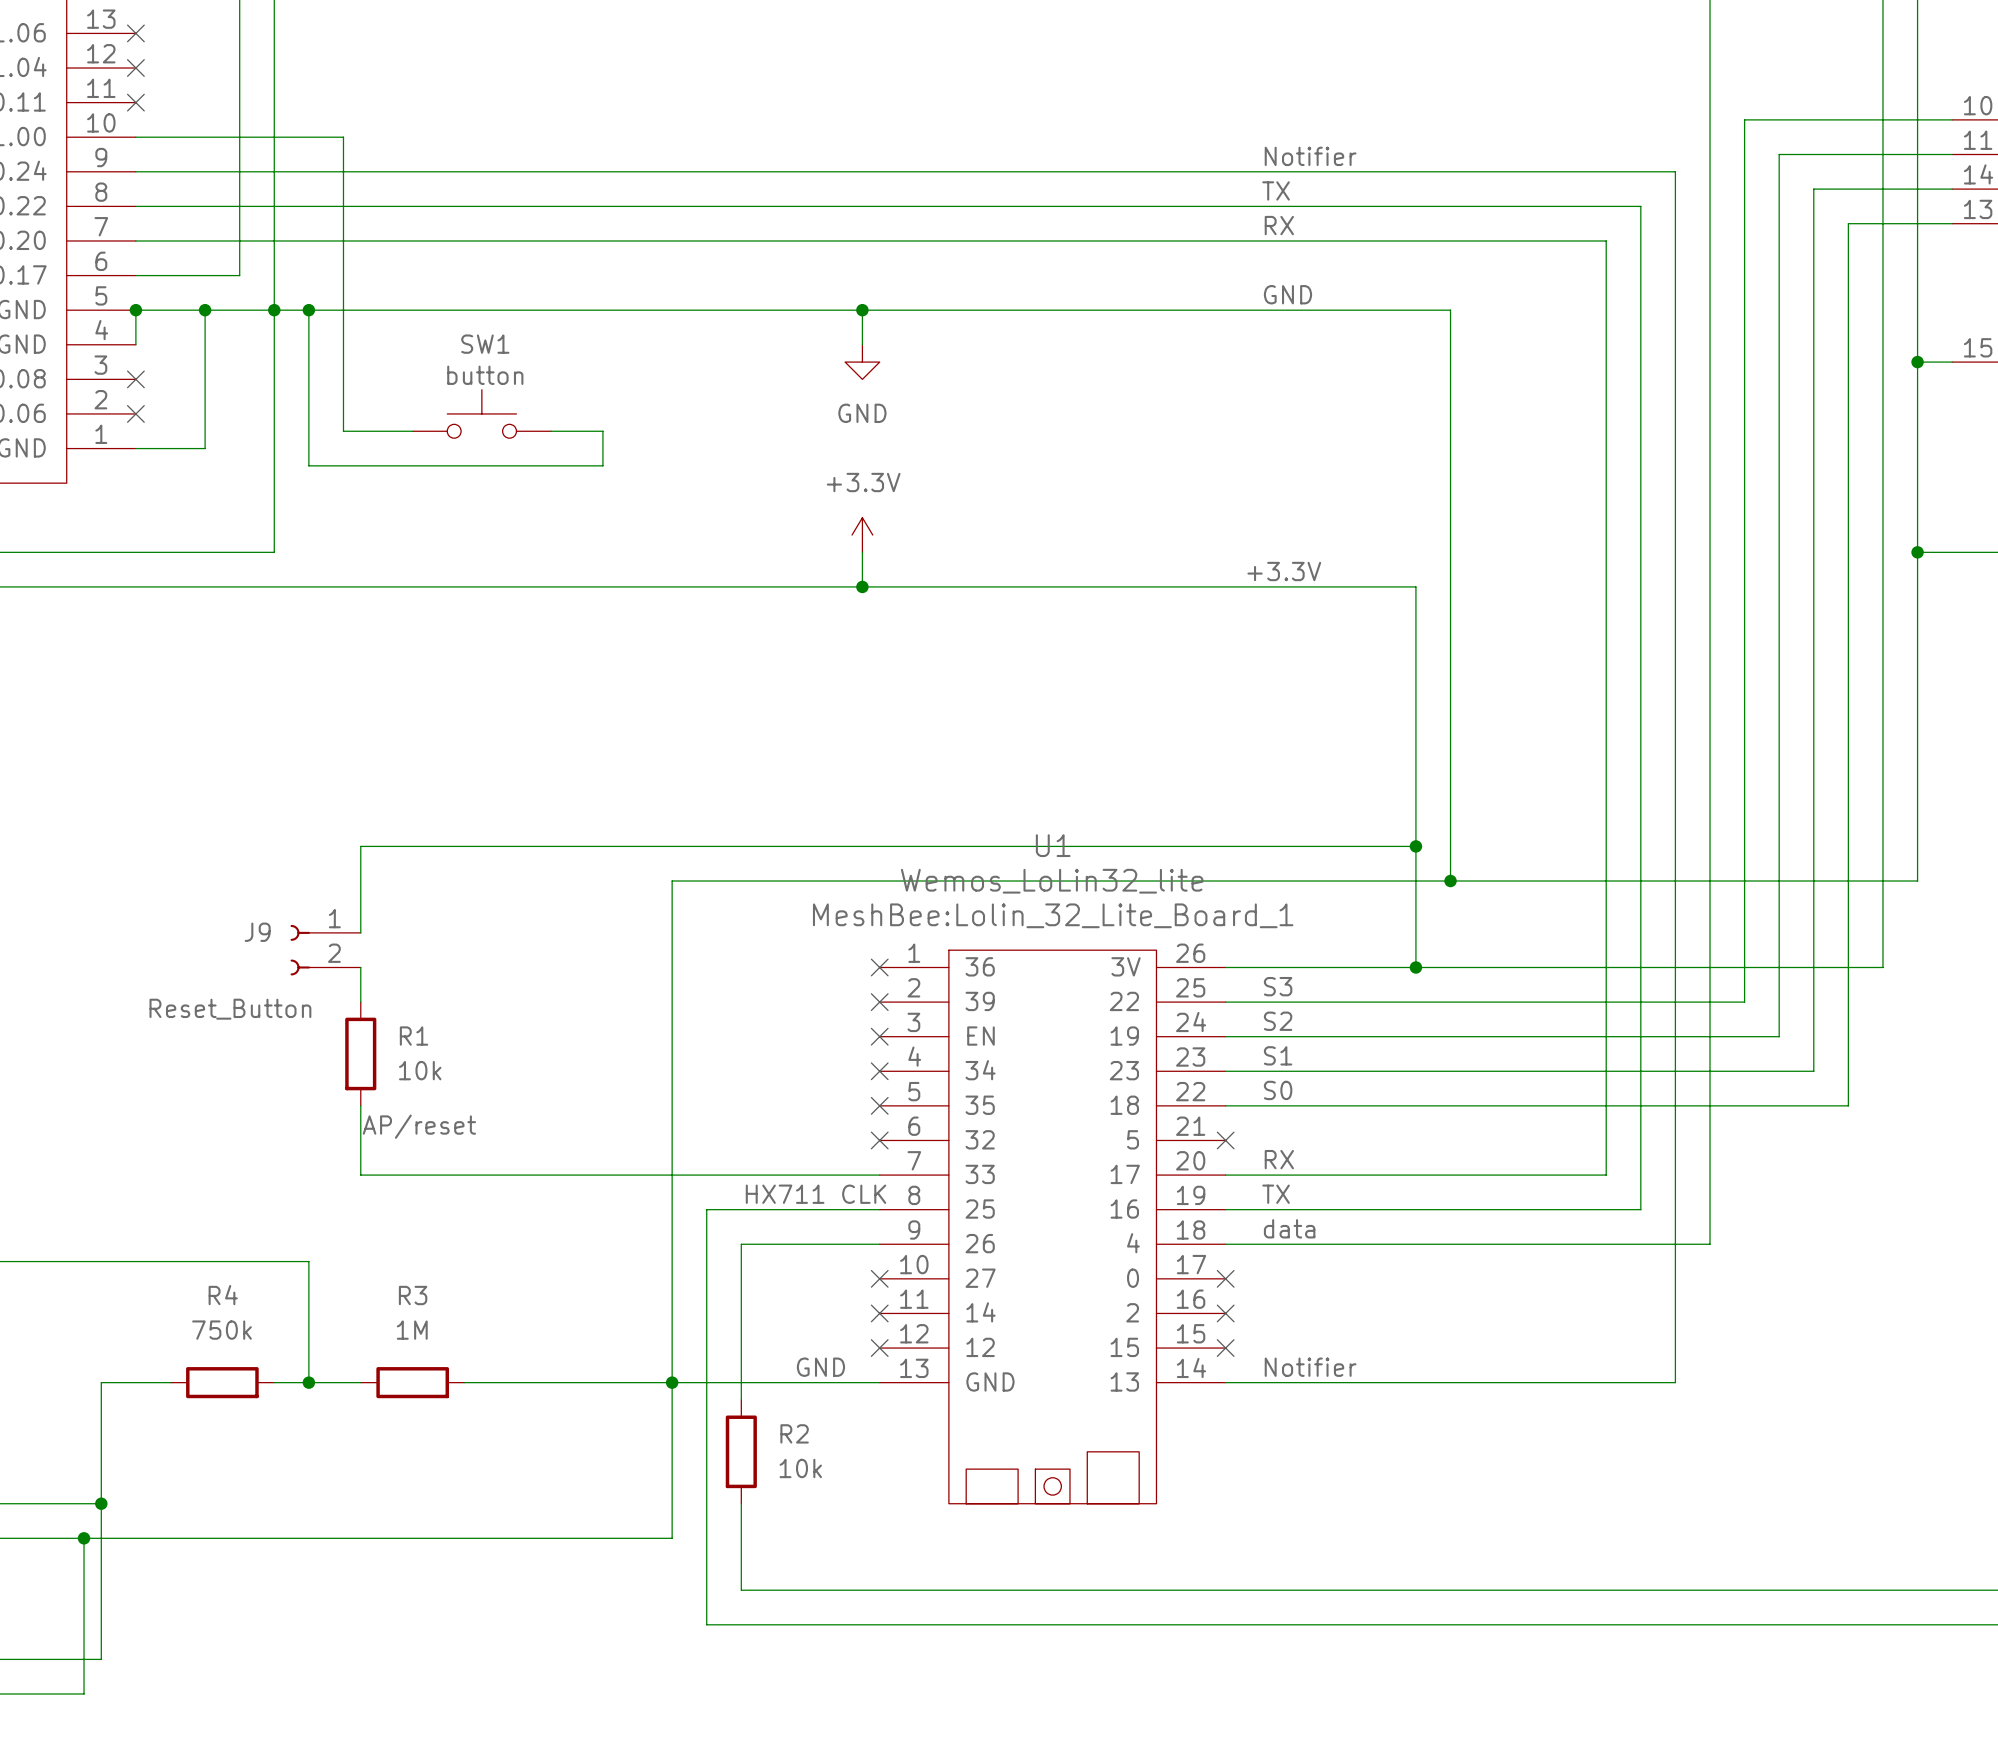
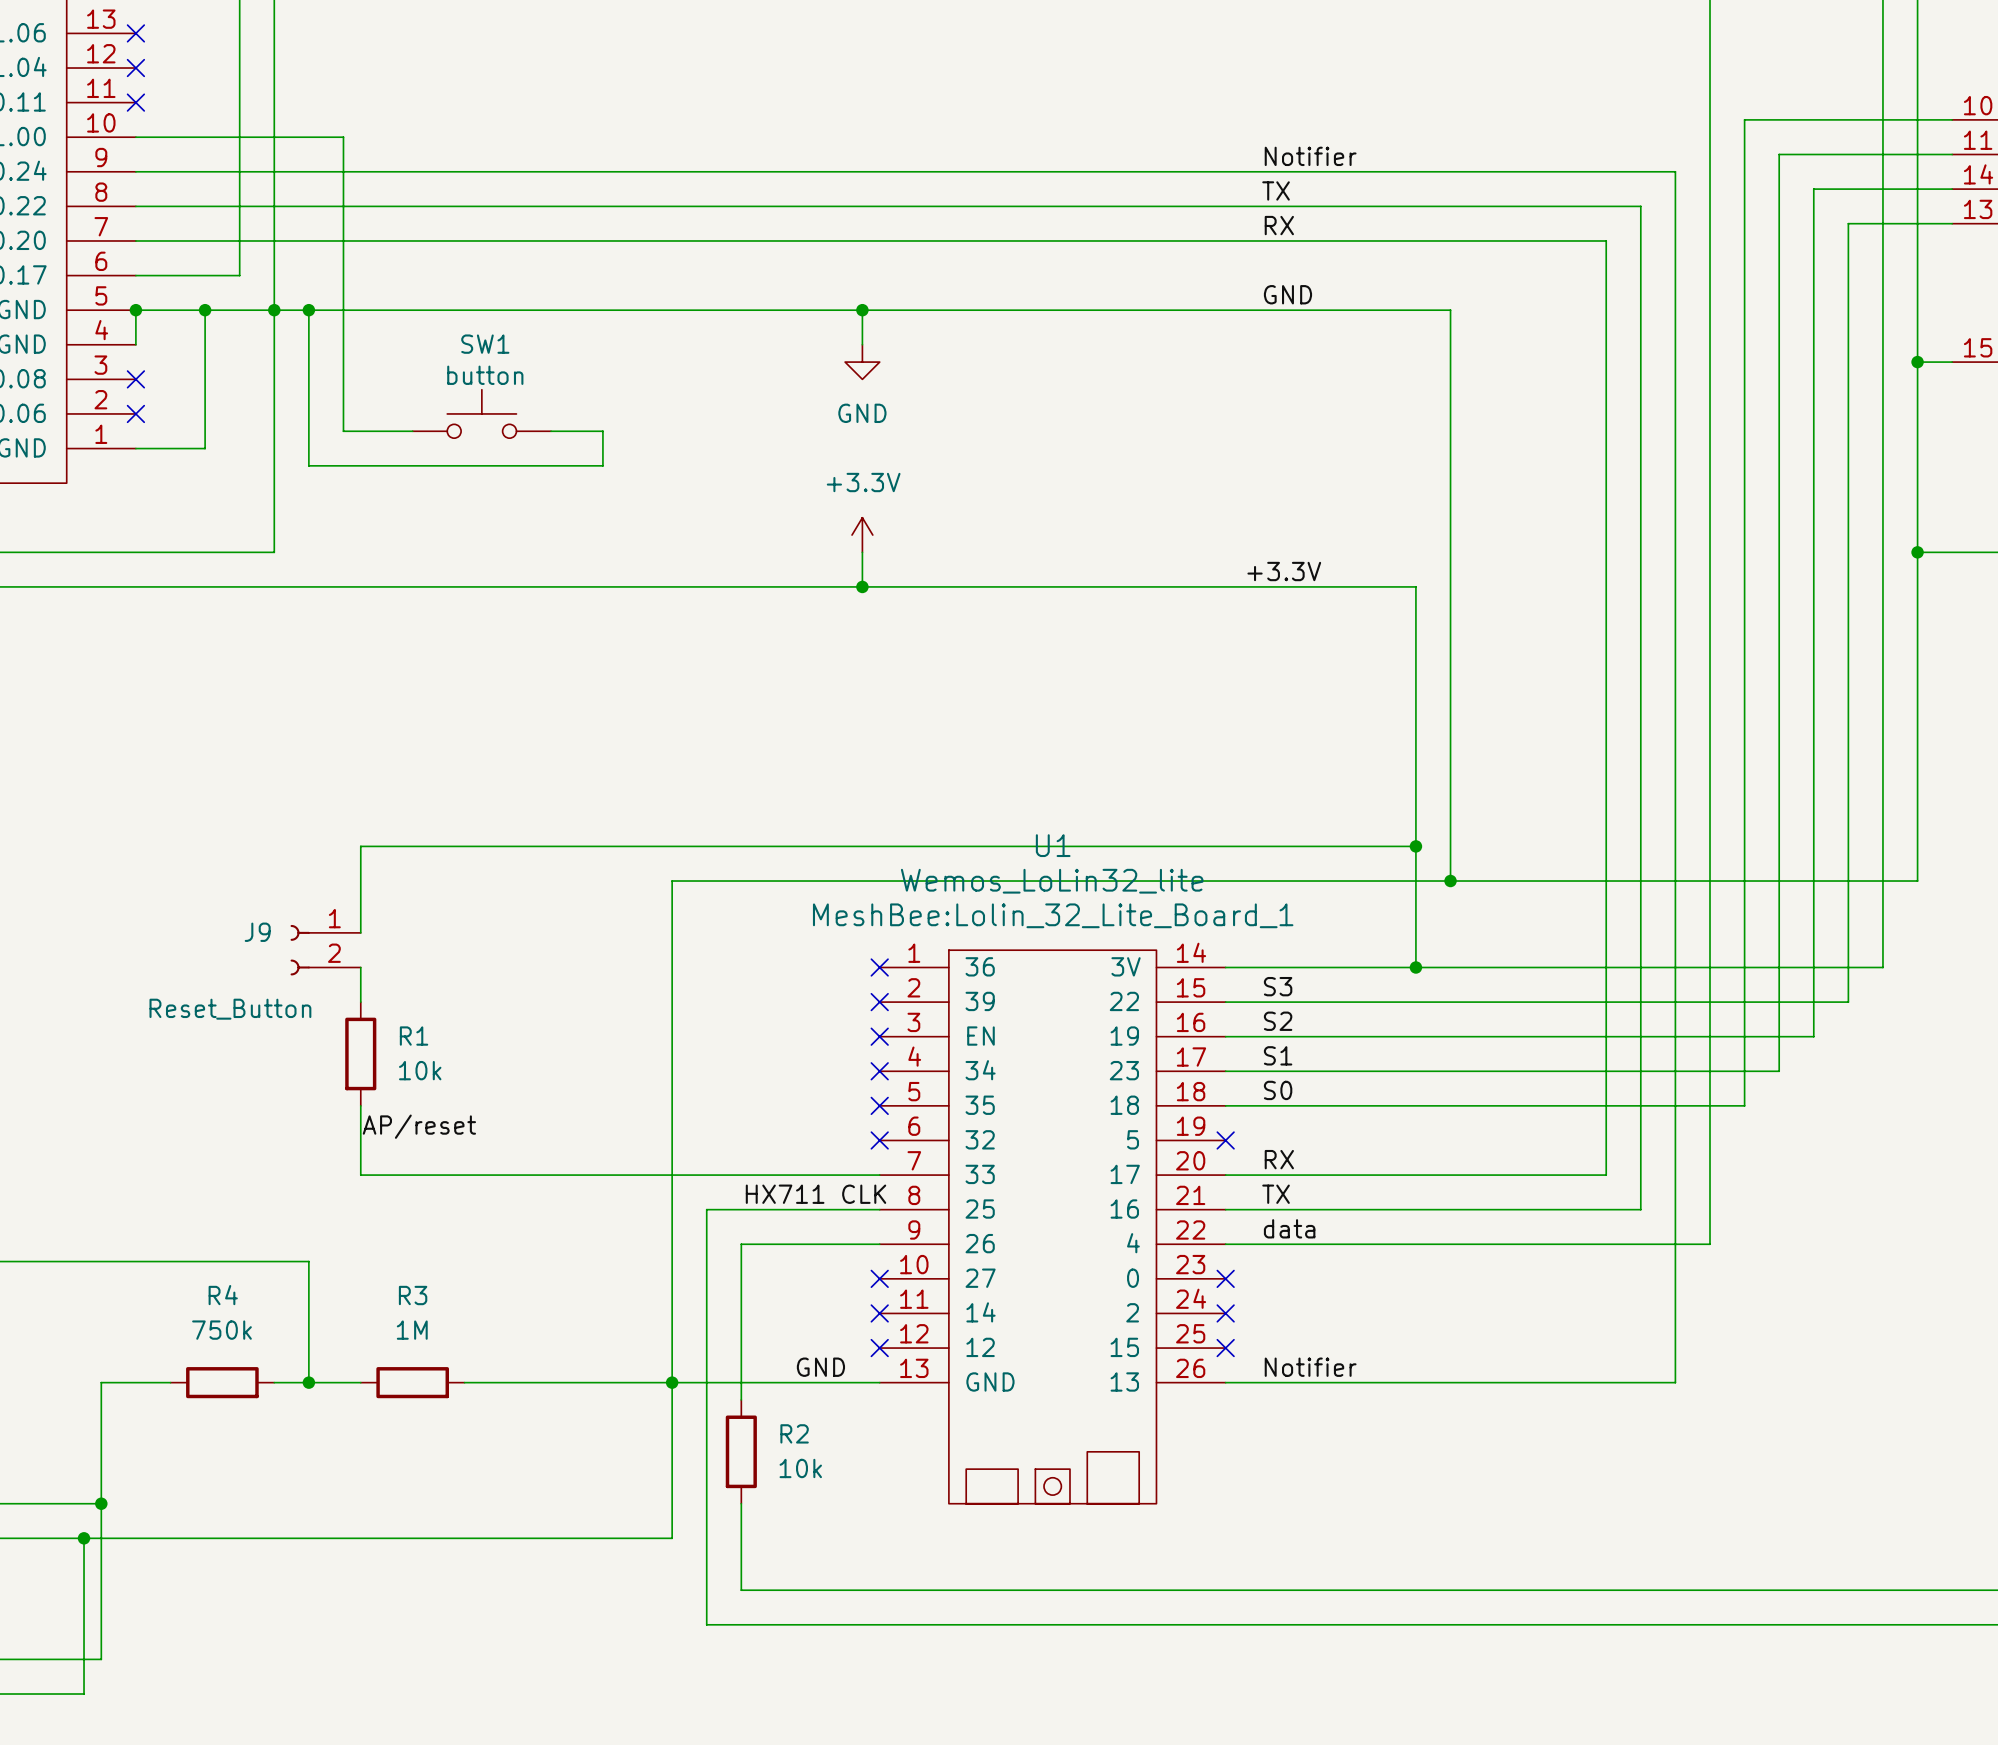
U1 symbol: [879, 950, 1226, 1504] -> [879, 950, 1226, 1504]
wire: (1848, 1002) (1848, 1105) (1744, 1105) -> (1848, 1002) (1744, 1002) (1744, 1105)
wire: (1813, 1036) (1813, 1071) (1779, 1071) -> (1813, 1036) (1779, 1036) (1779, 1071)

